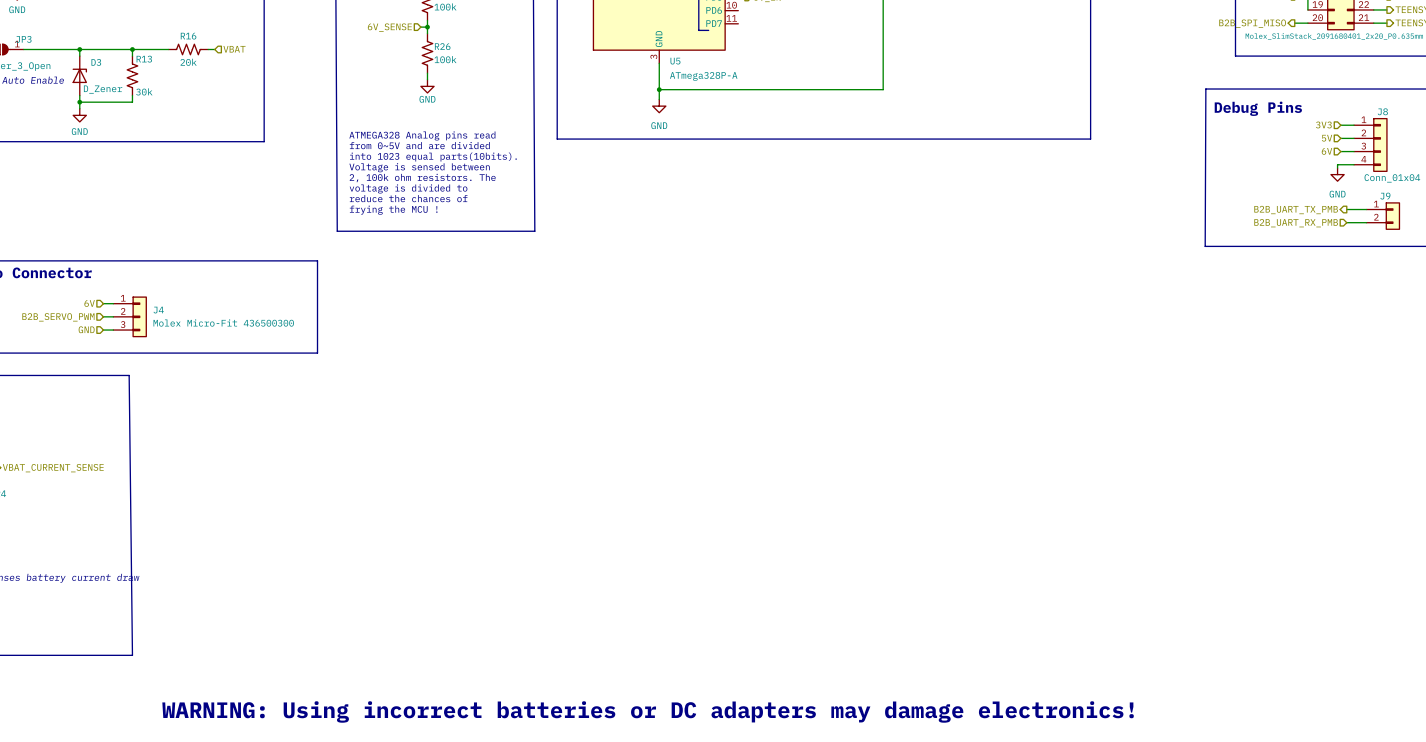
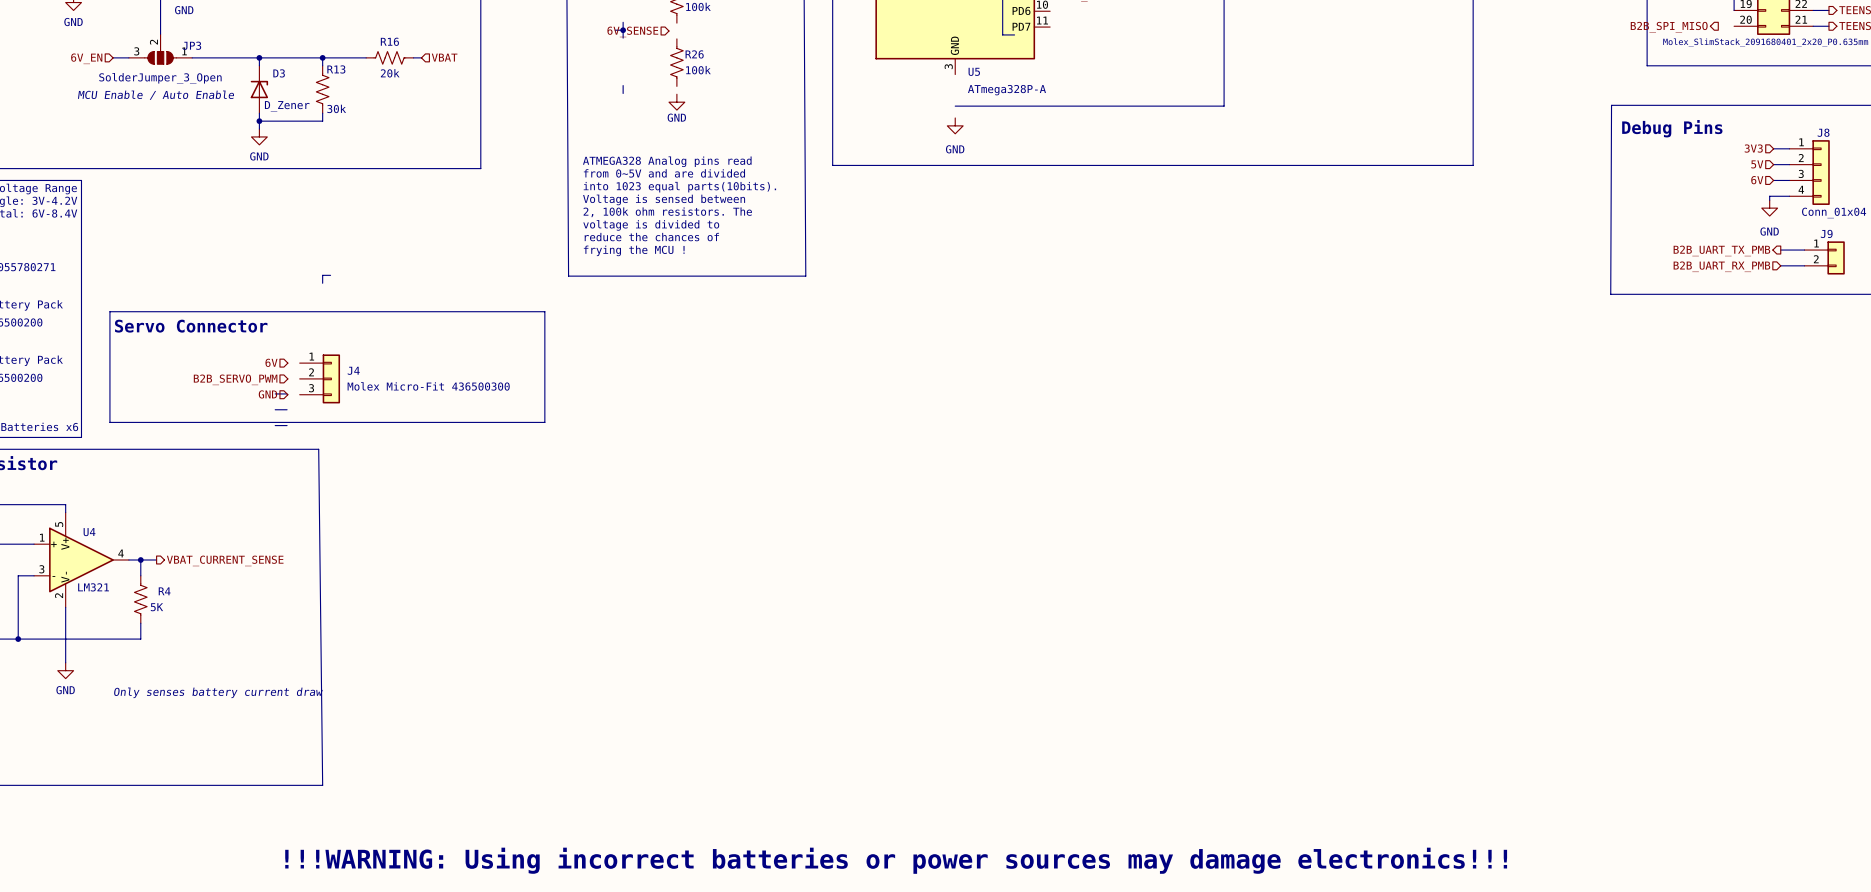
wire: (427, 20) (427, 33) -> (623, 22) (623, 38)
wire: (1294, 23) (1307, 23) -> none
junction: none -> (623, 30)
wire: (420, 27) (427, 27) -> (615, 30) (623, 30)
junction: (427, 27) -> none
wire: (659, 63) (659, 99) -> none
wire: (427, 73) (427, 79) -> (623, 85) (623, 93)
junction: (659, 89) -> none
wire: none -> (330, 275) (322, 275) (322, 283)
wire: (103, 303) (113, 303) -> (275, 393) (287, 393)
wire: (103, 316) (113, 316) -> (275, 409) (287, 409)
wire: (103, 330) (113, 330) -> (275, 425) (287, 425)
text: WARNING: Using incorrect batteries or DC adapters may damage electronics! (648, 711) -> !!!WARNING: Using incorrect batteries or power sources may damage electronics!!! (896, 860)

